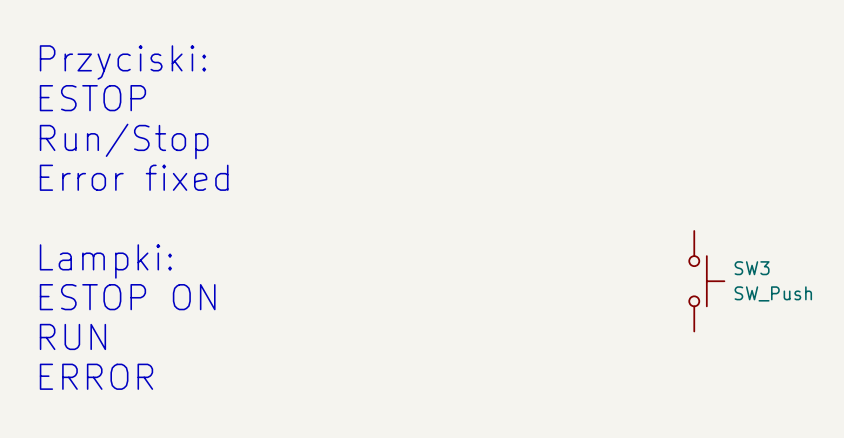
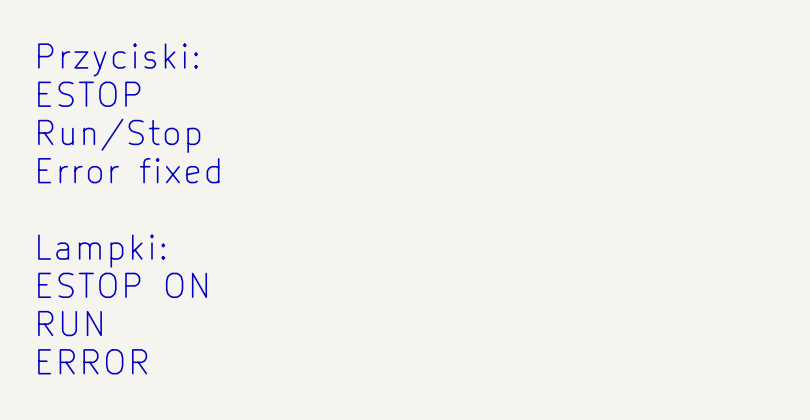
SW3: SW_Push (706, 281) -> none

